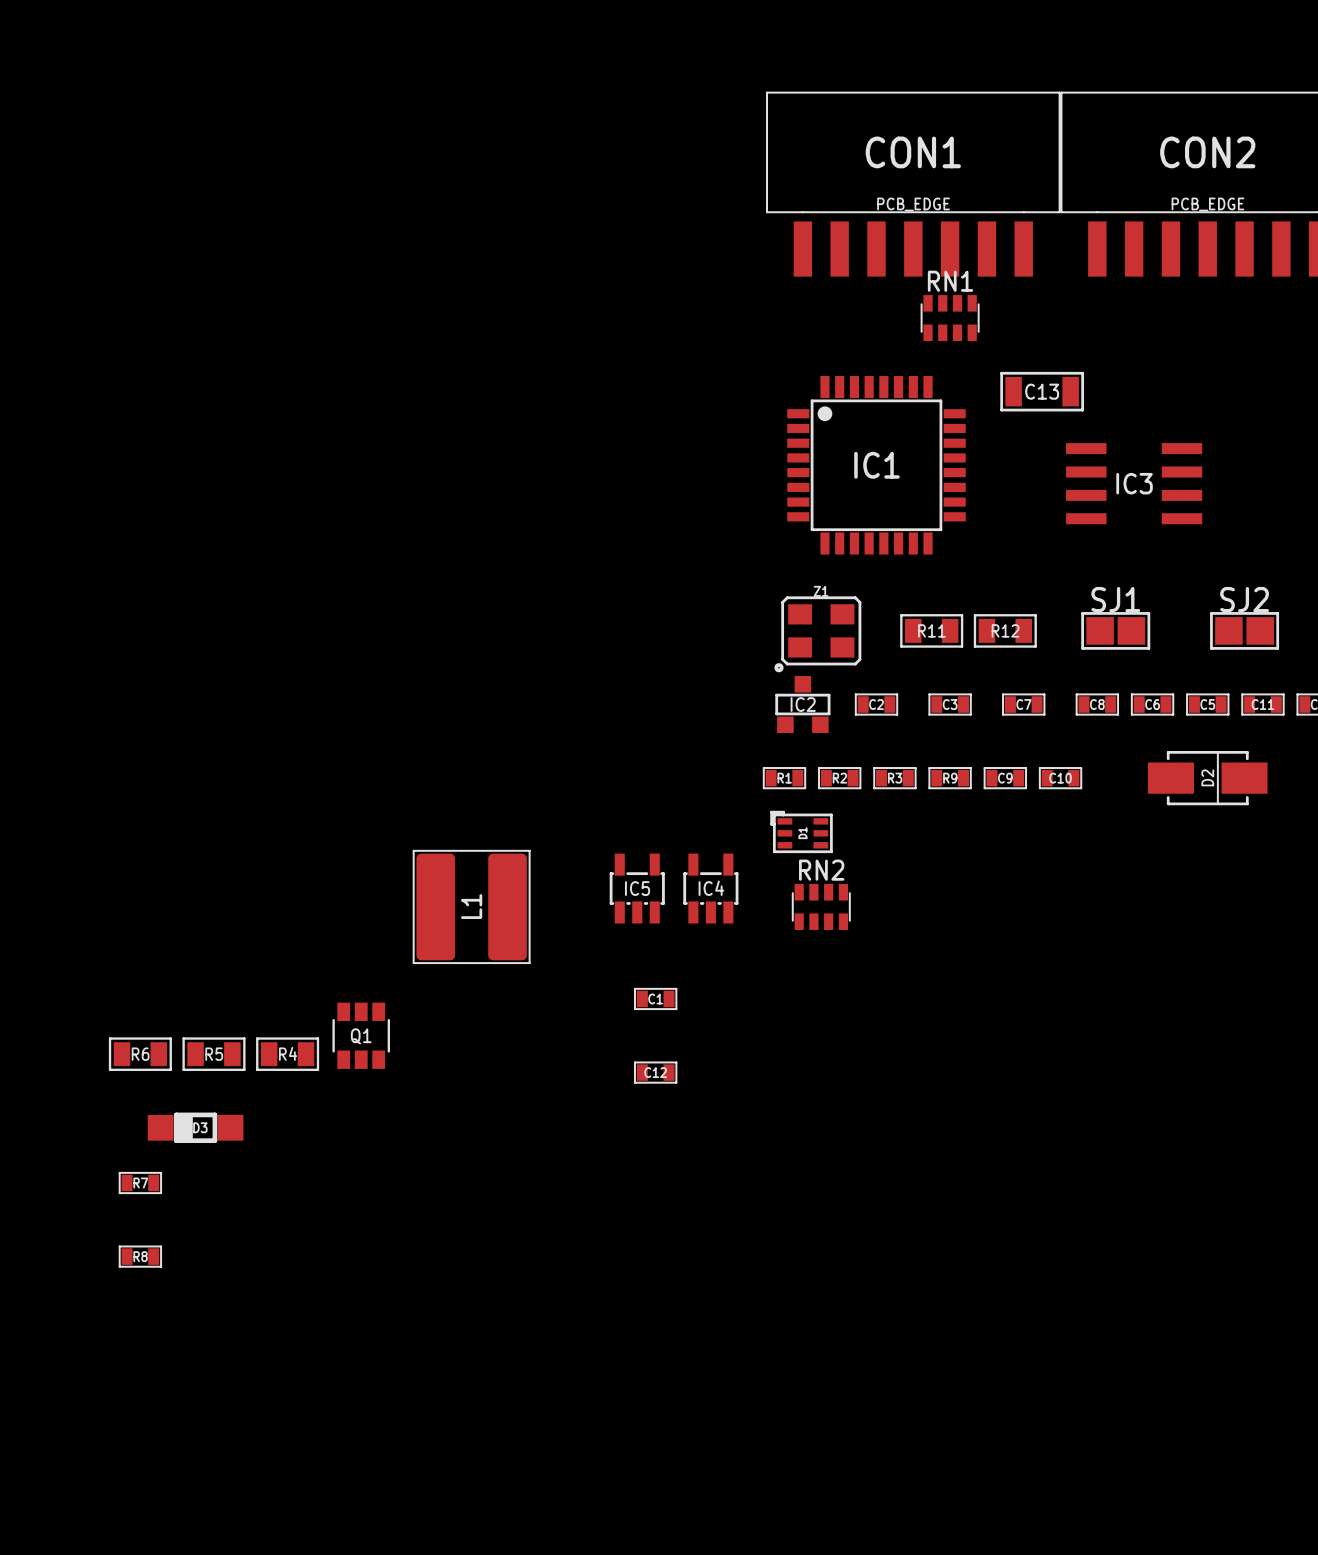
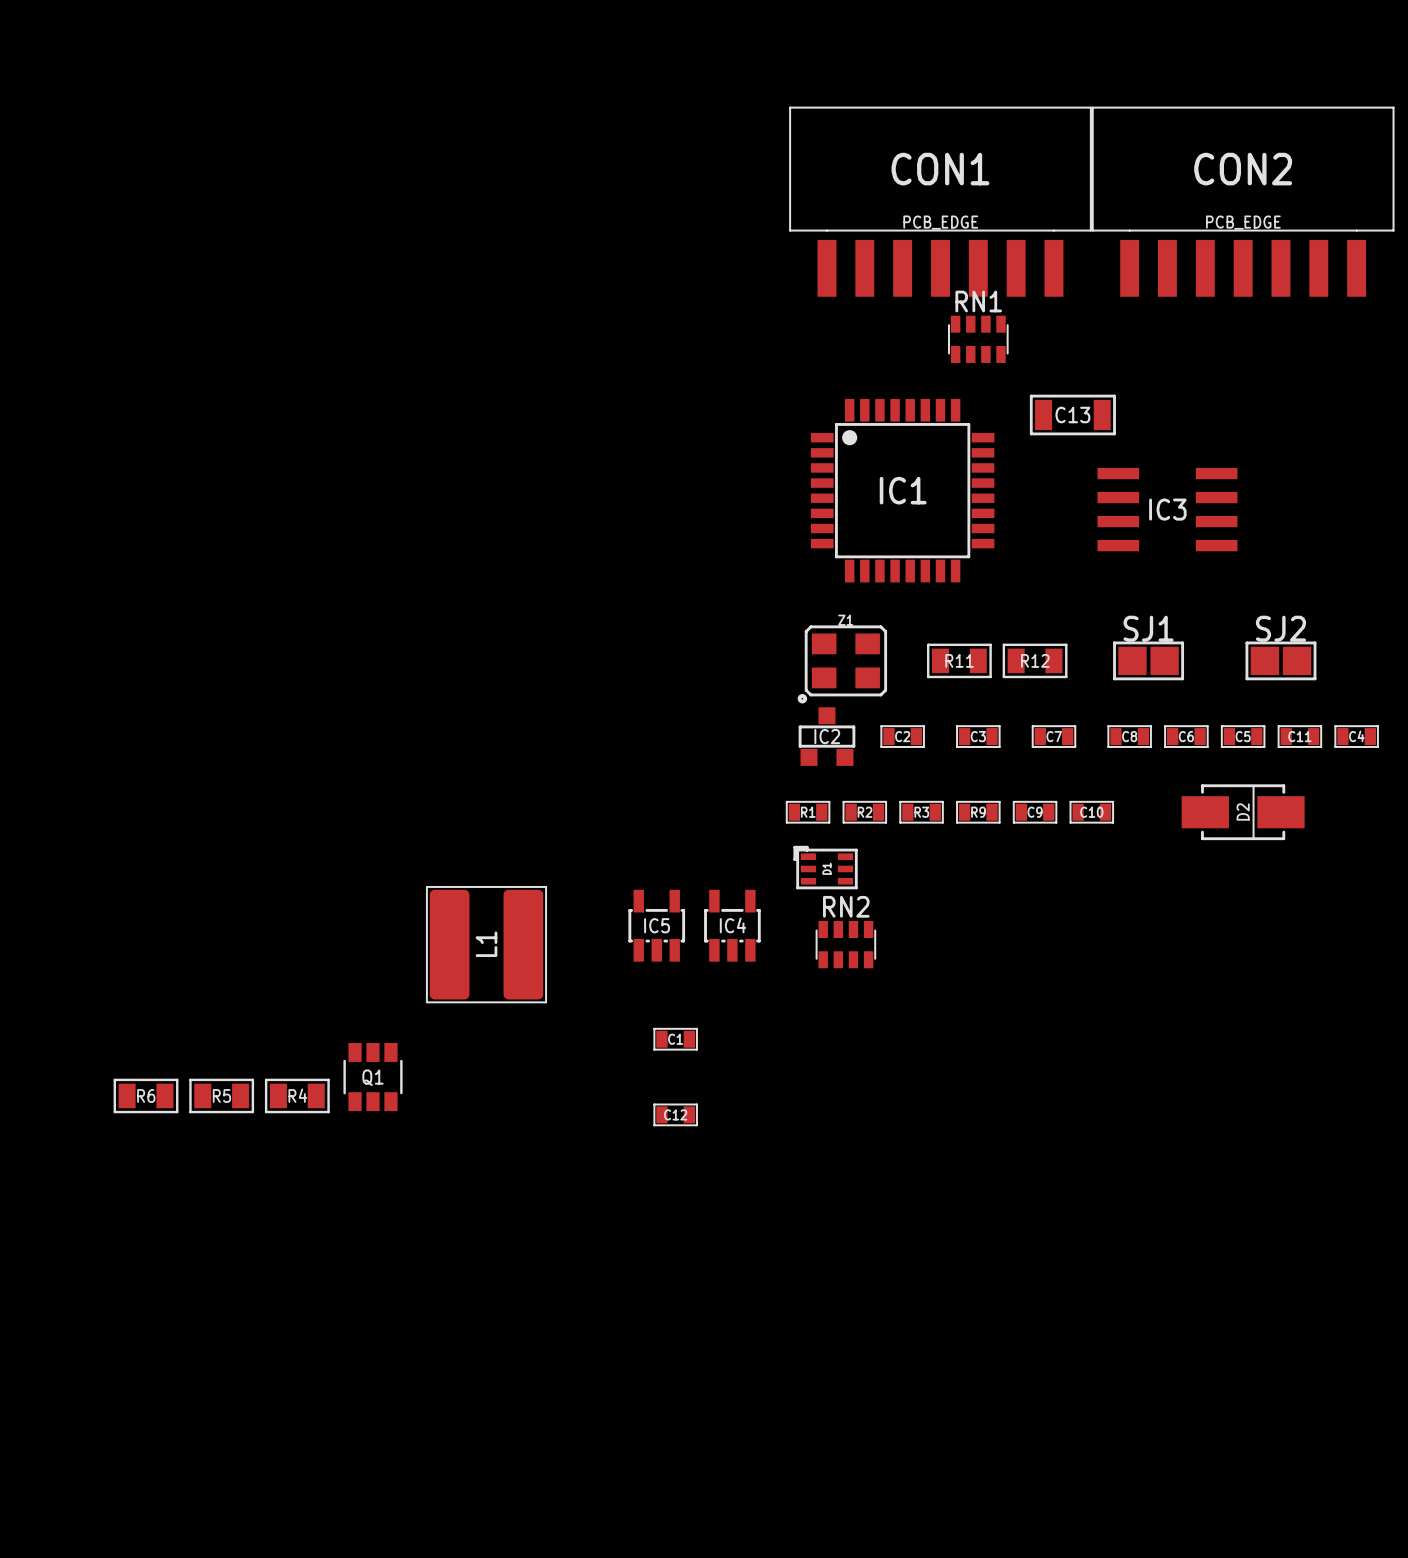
D3: (195, 1127) -> none
R7: (140, 1183) -> none
R8: (140, 1256) -> none

